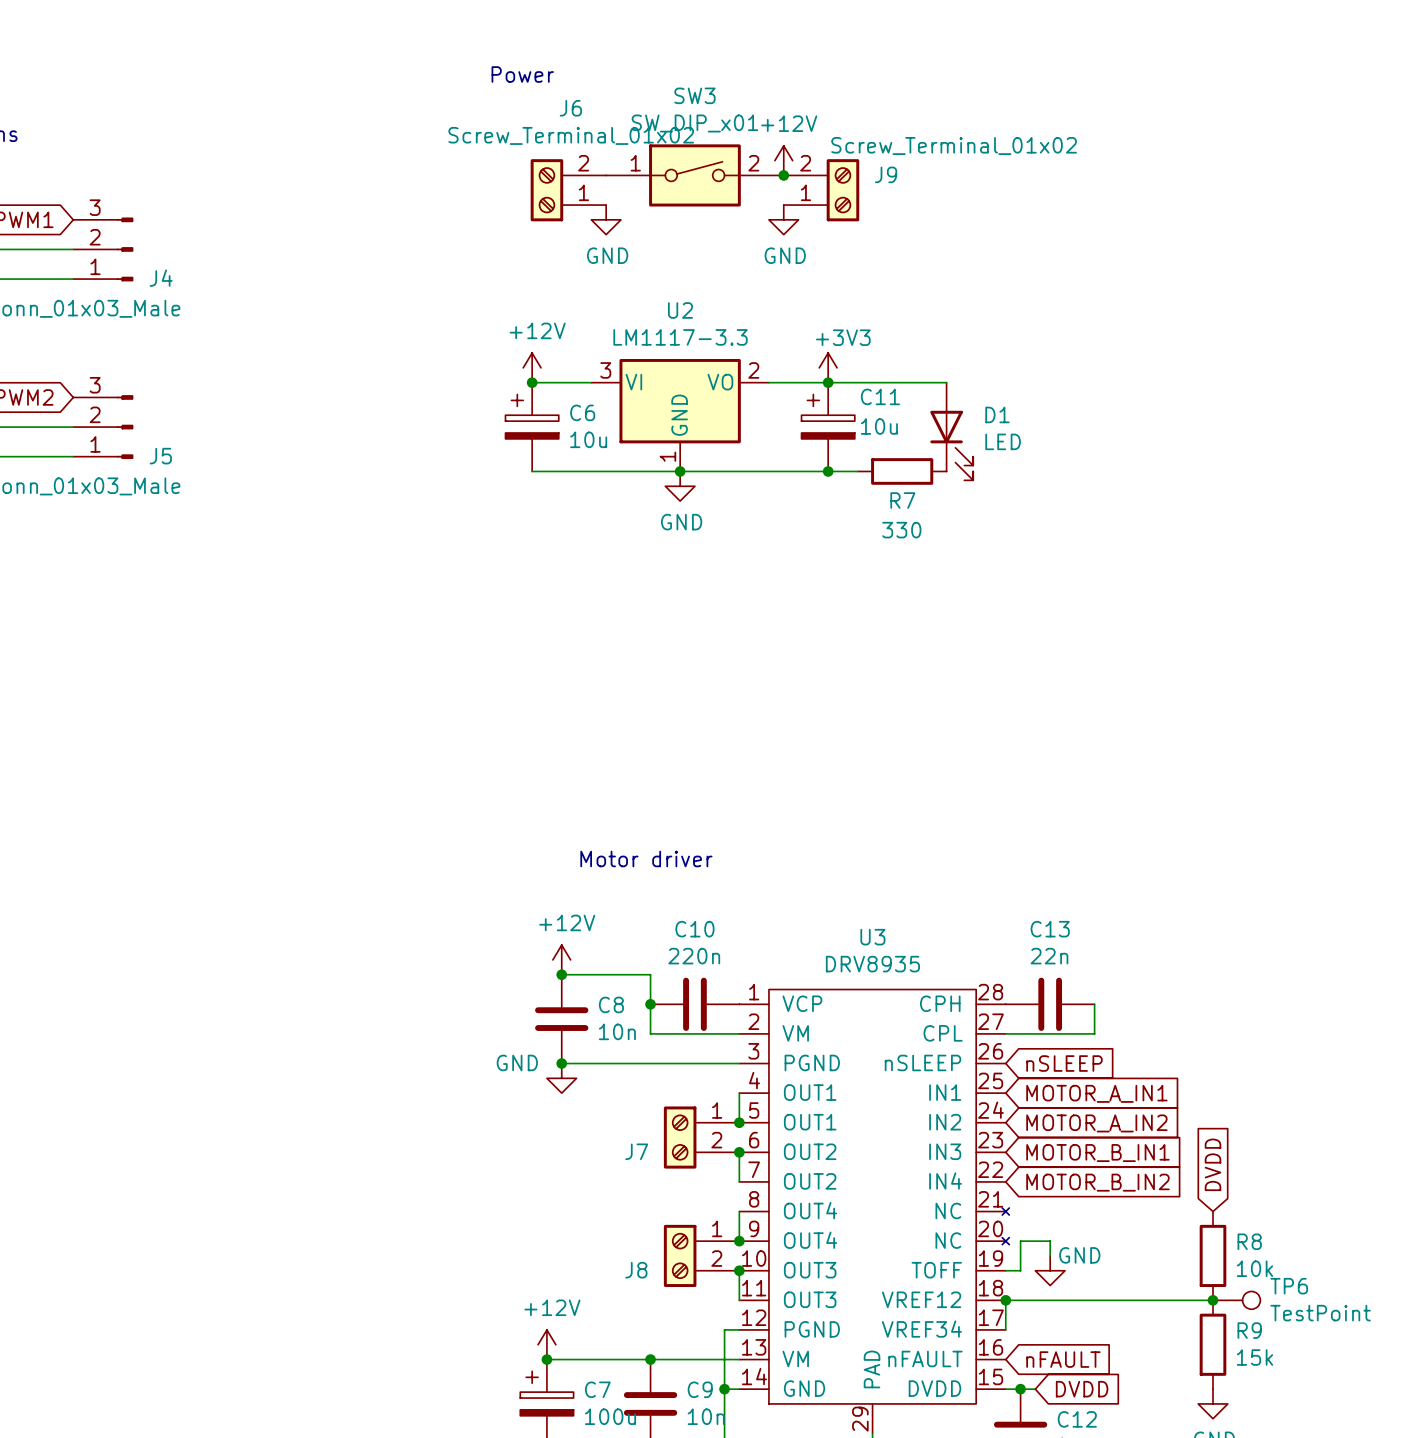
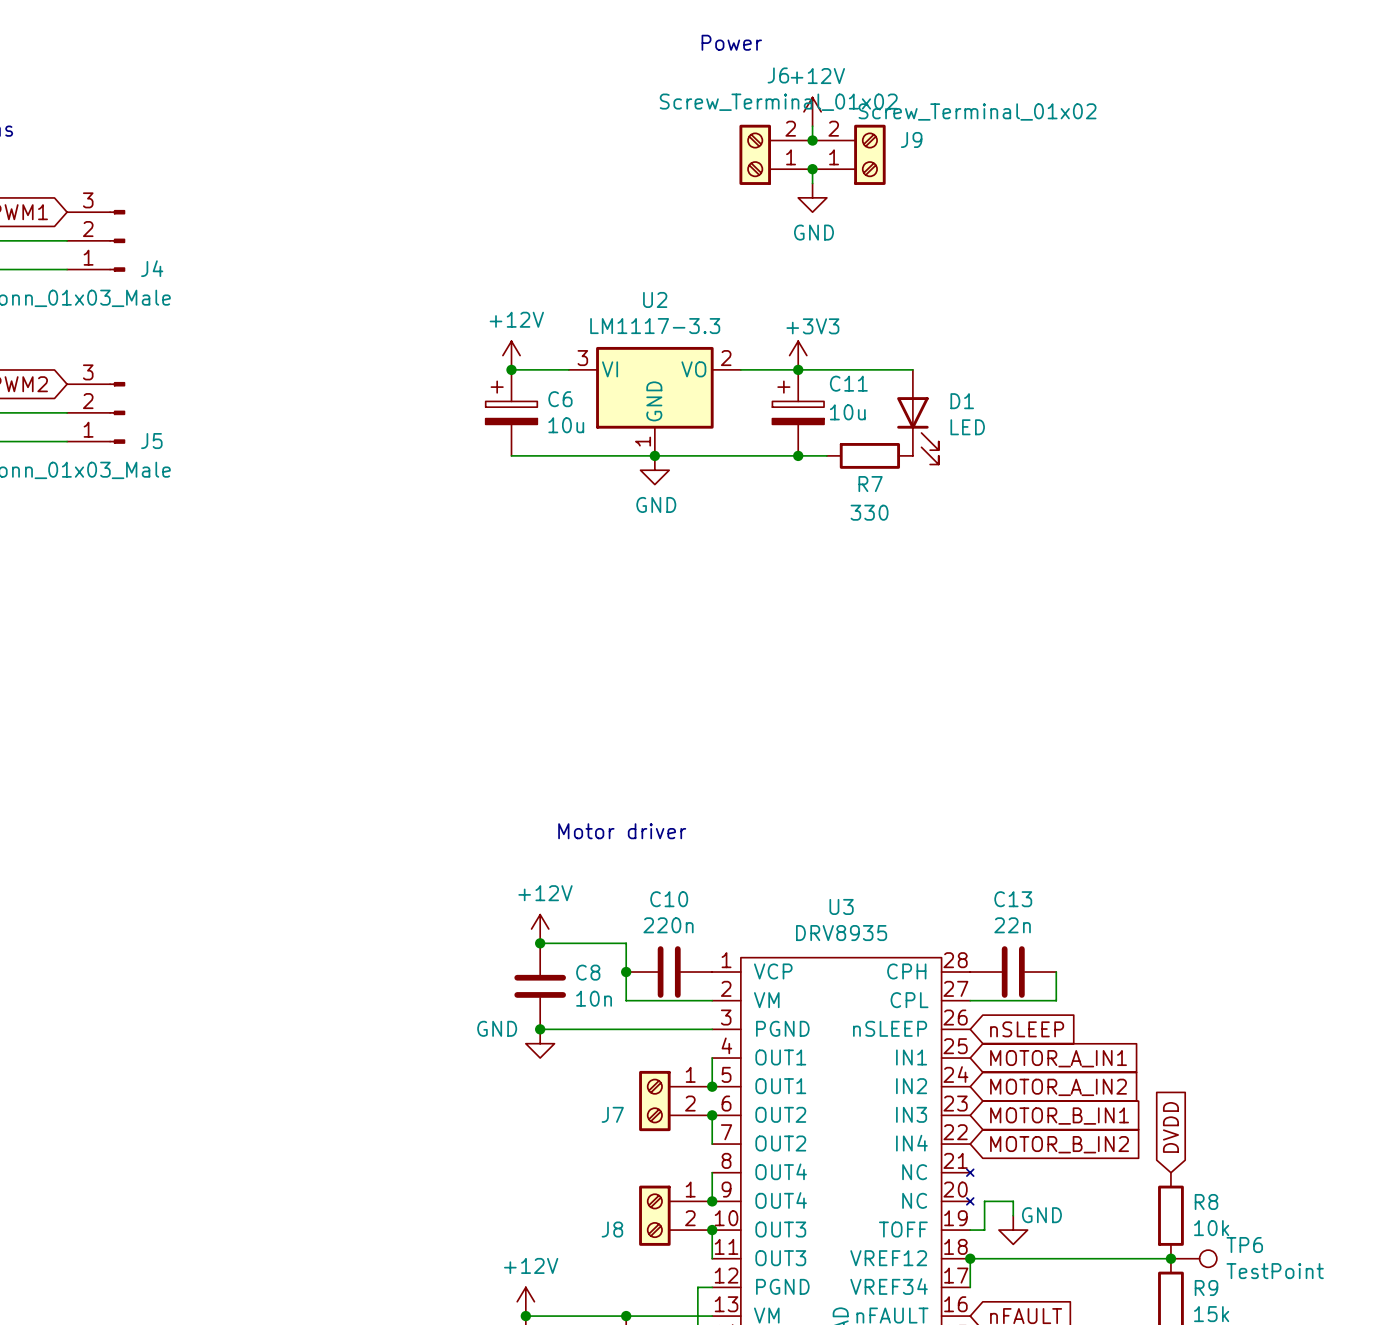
text position: Power (522, 74) -> Power (731, 42)
wire: none -> (812, 126) (812, 140)
junction: none -> (812, 140)
power symbol position: +12V (783, 160) -> +12V (812, 111)
SW3: SW_DIP_x01 (694, 175) -> none
junction: (783, 175) -> none
junction: none -> (812, 169)
J6 position: (568, 190) -> (776, 154)
J9 position: (821, 190) -> (849, 154)
power symbol: GND (606, 219) -> none
power symbol position: GND (783, 219) -> GND (812, 197)

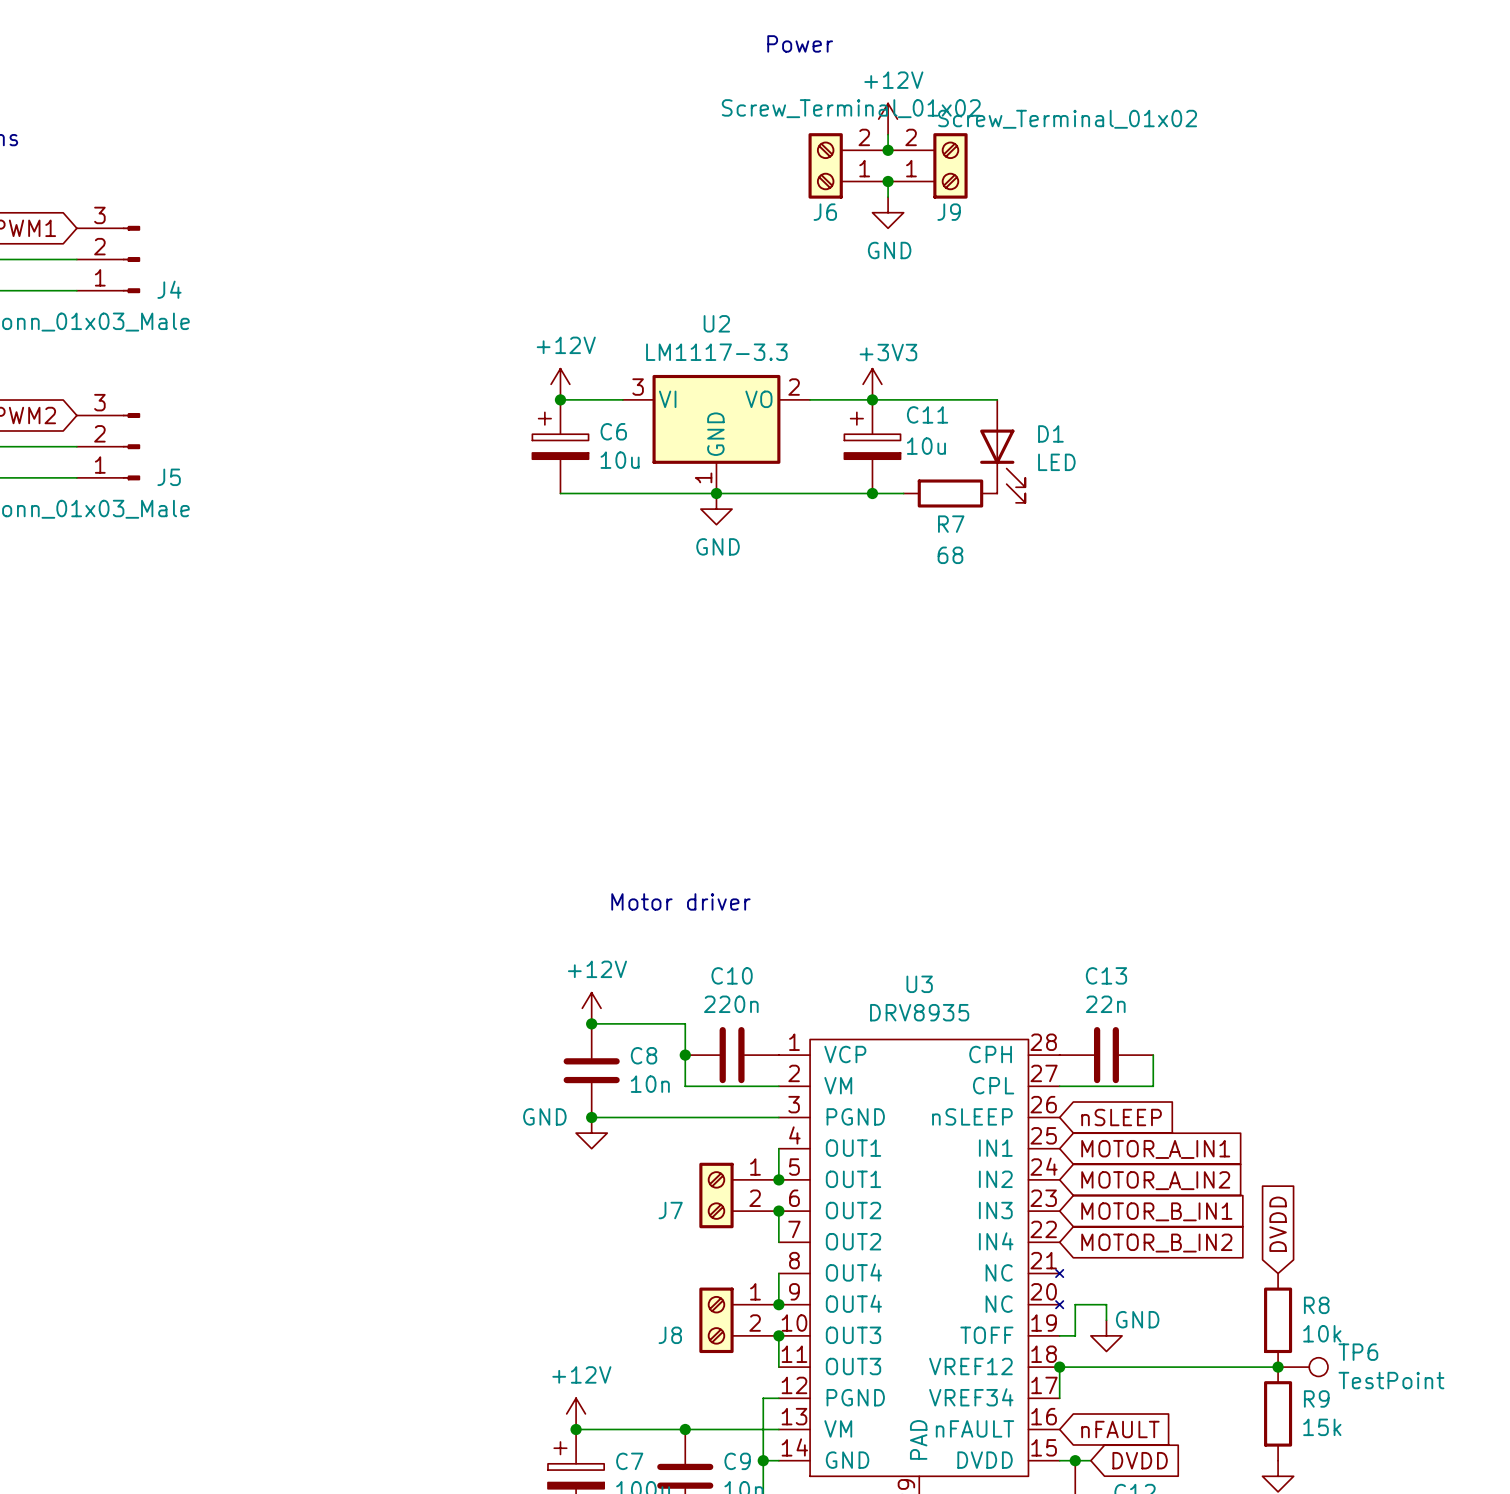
J6 name position: J6 (778, 75) -> J6 (825, 212)
J9 name position: J9 (911, 139) -> J9 (949, 212)
R7 value: 330 (869, 512) -> 68 (950, 555)

